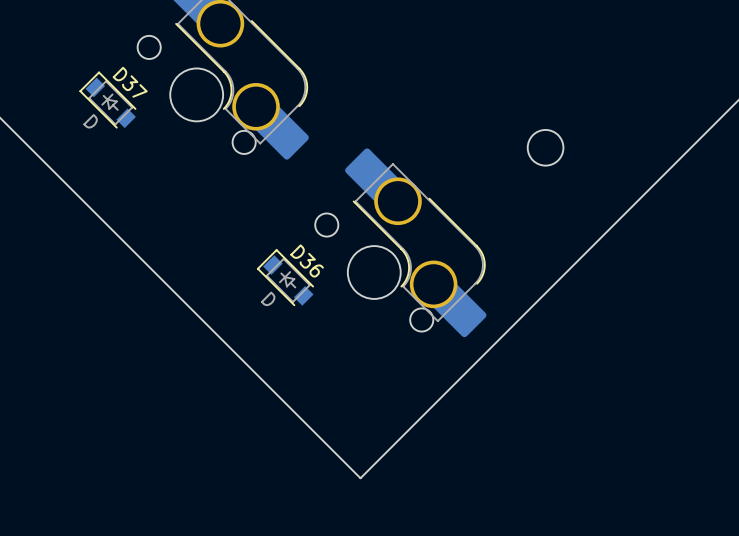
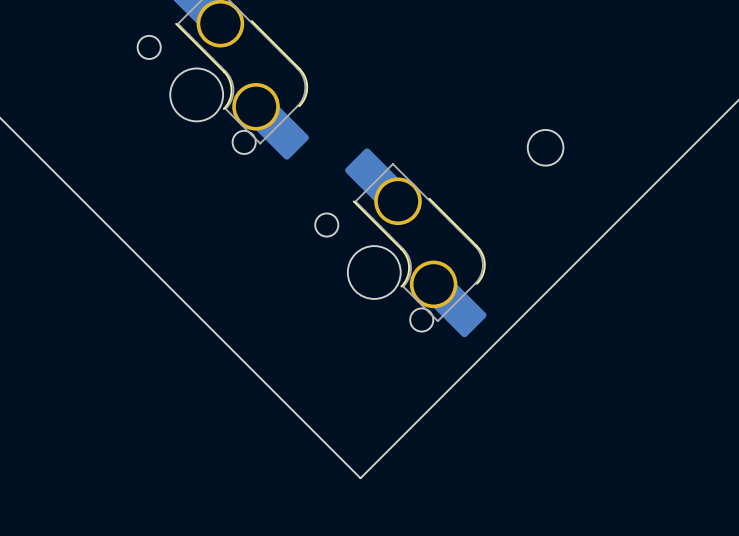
D37: D (107, 100) -> none
D36: D (285, 277) -> none

